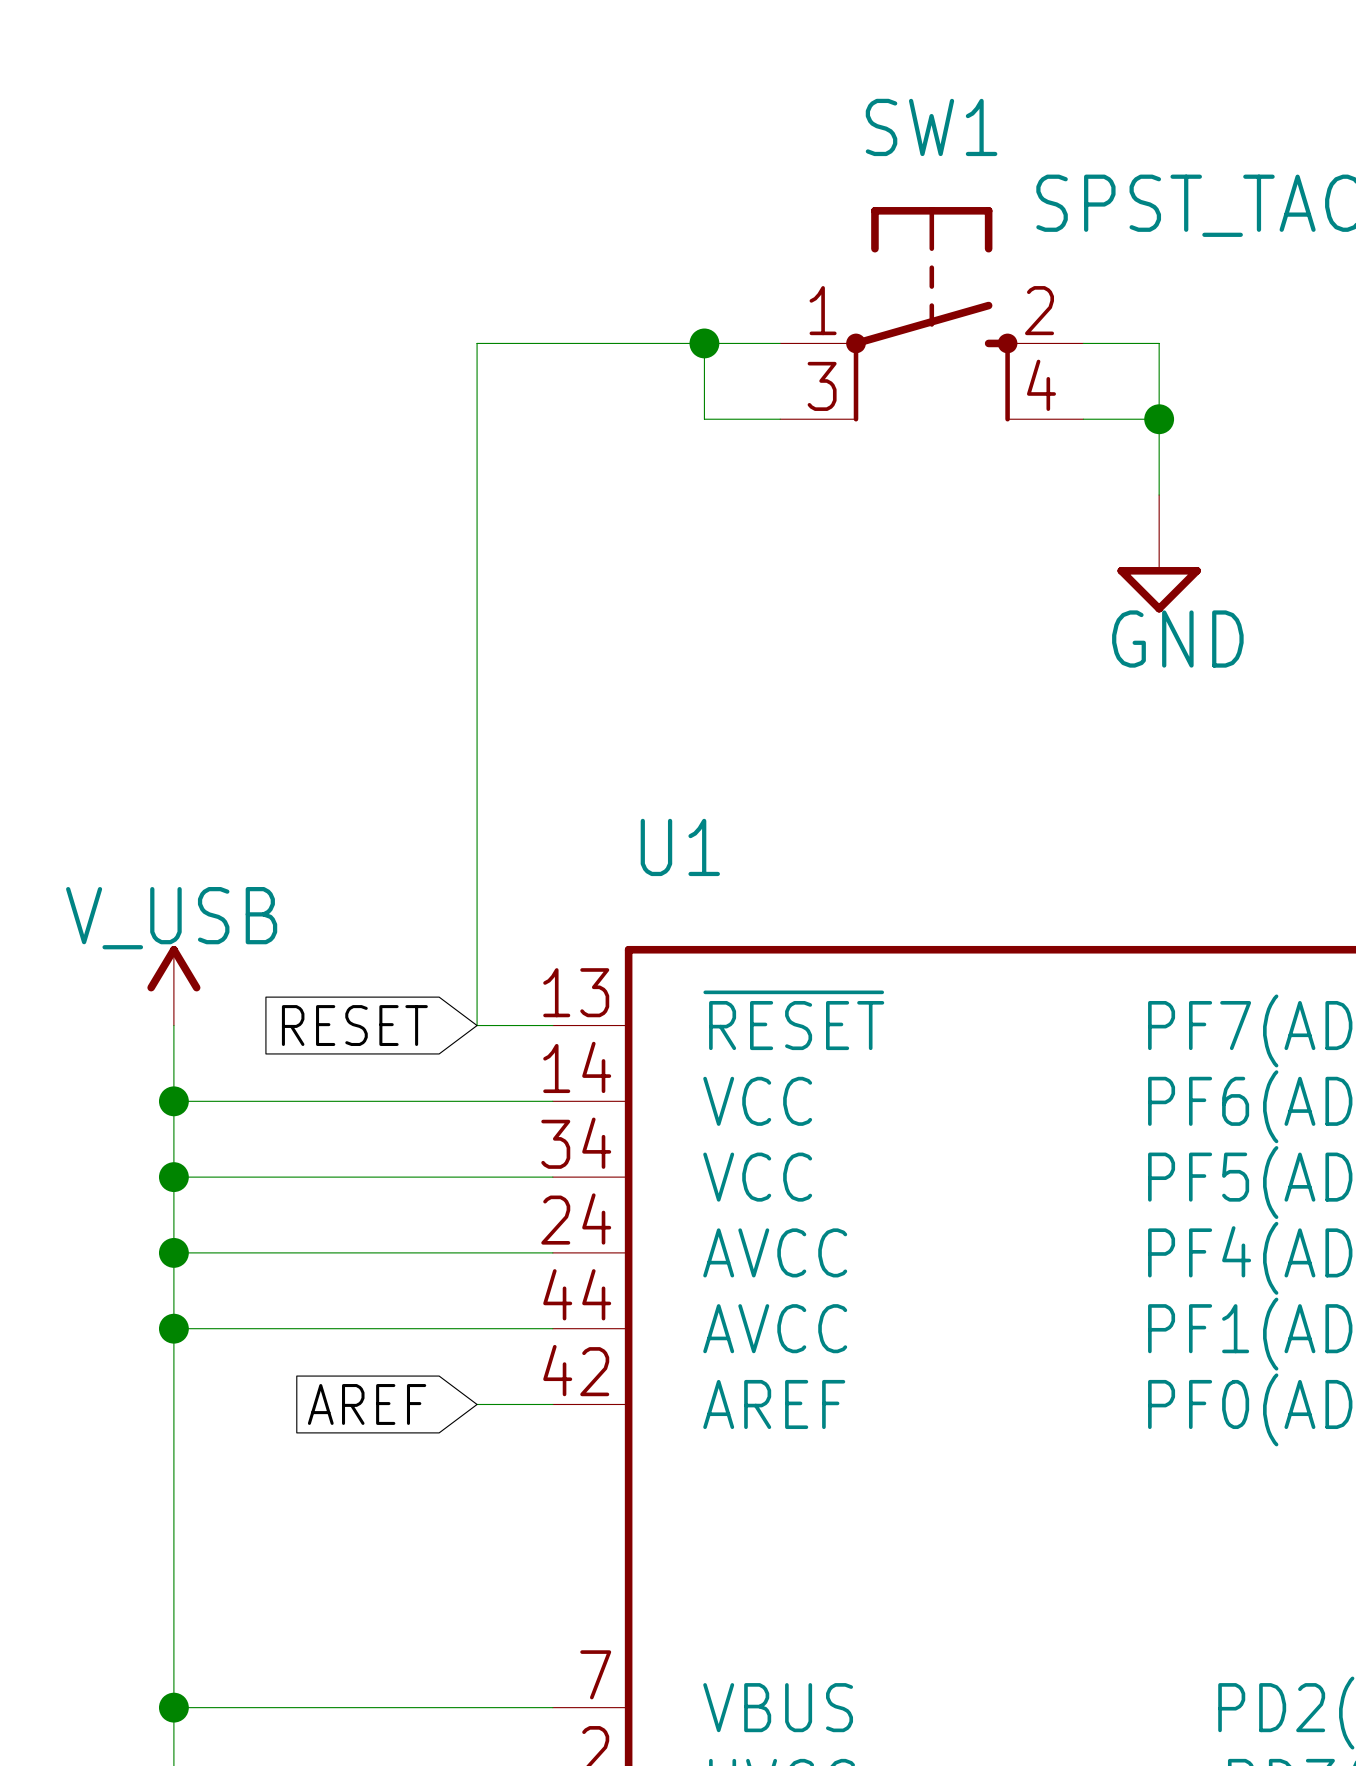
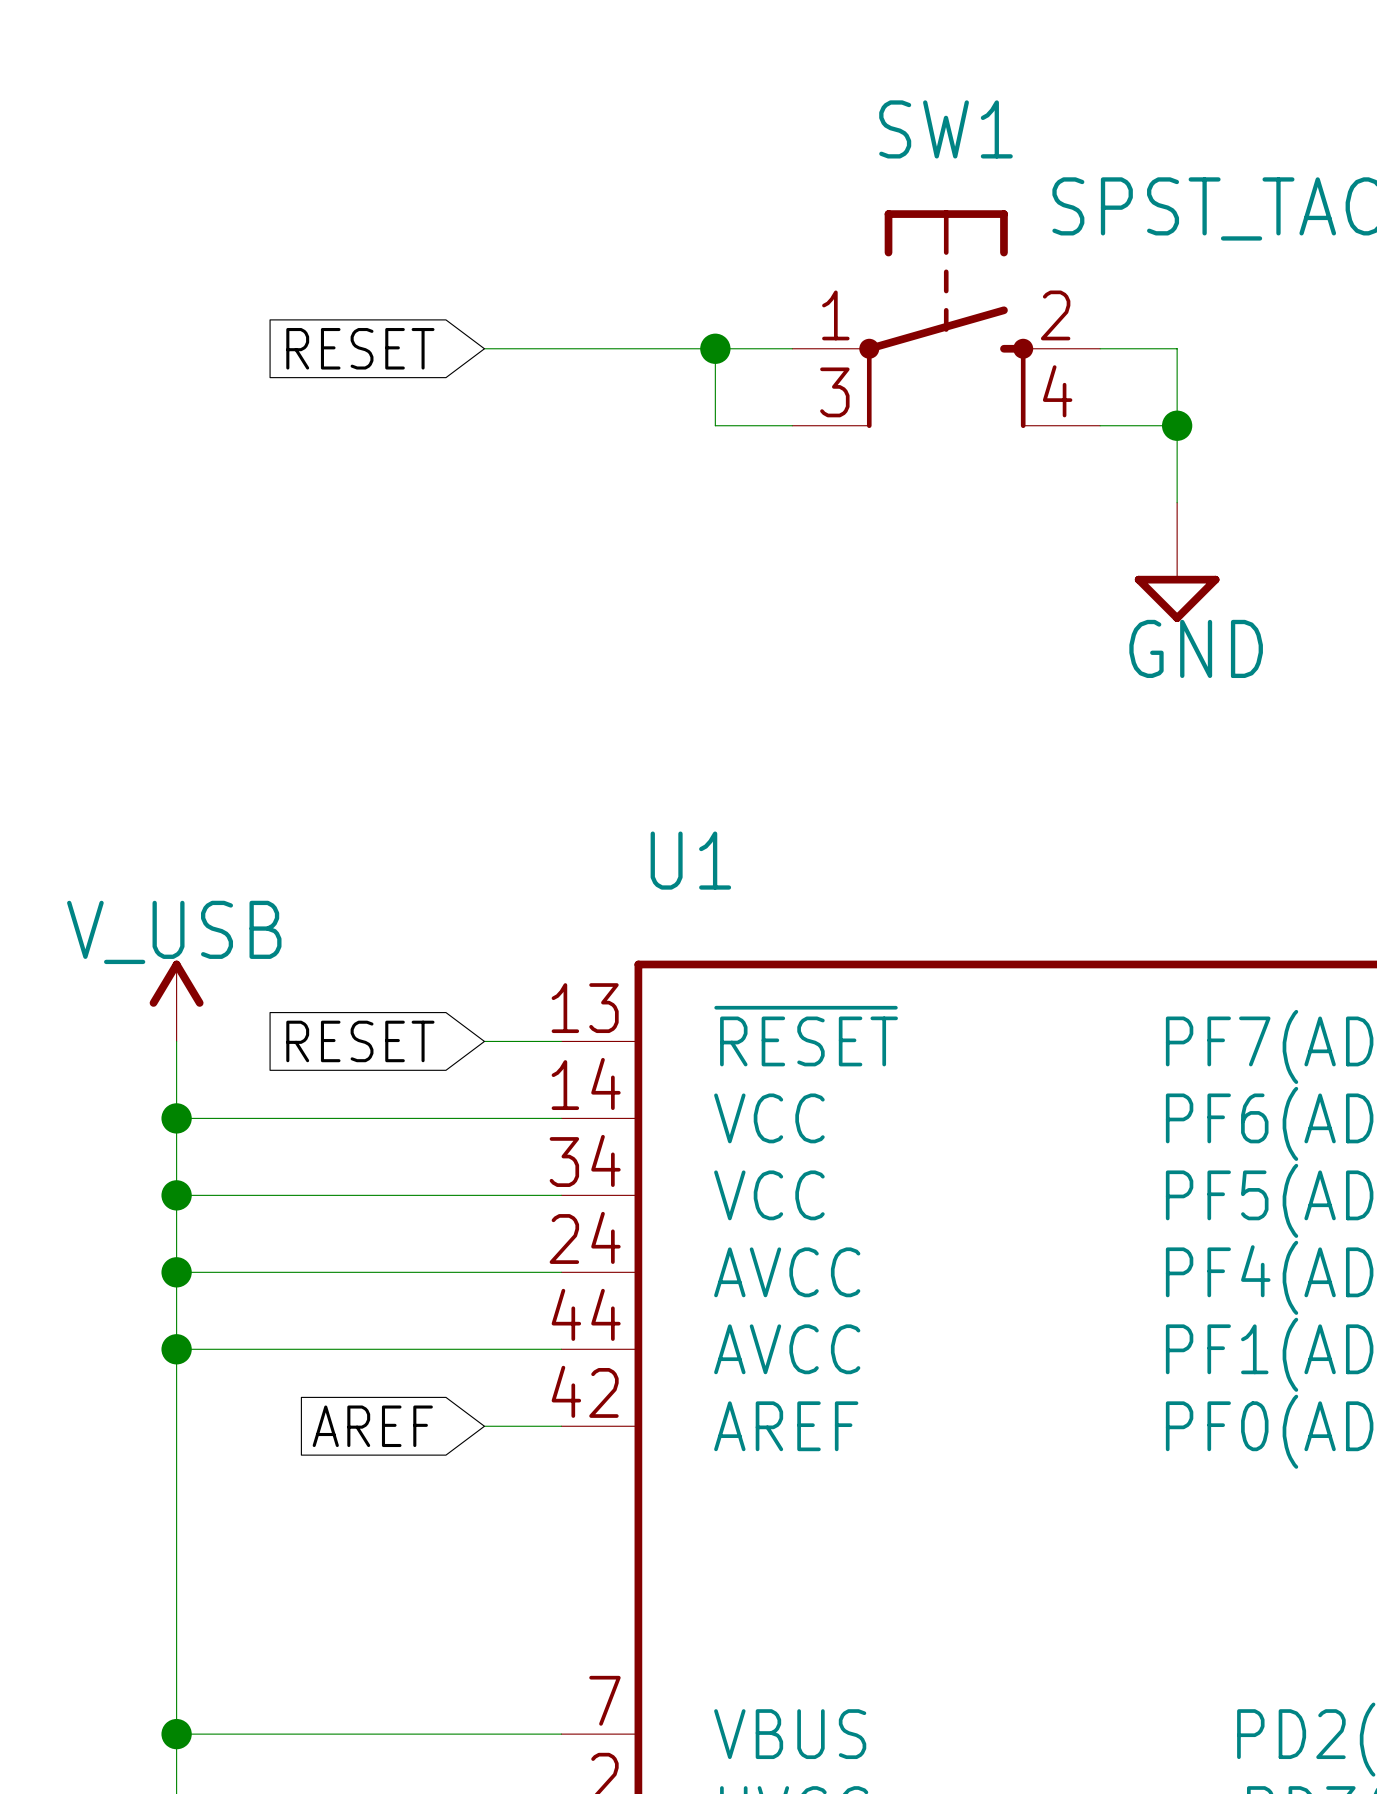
global label: none -> RESET (360, 348)
wire: (477, 343) (477, 1025) -> none

